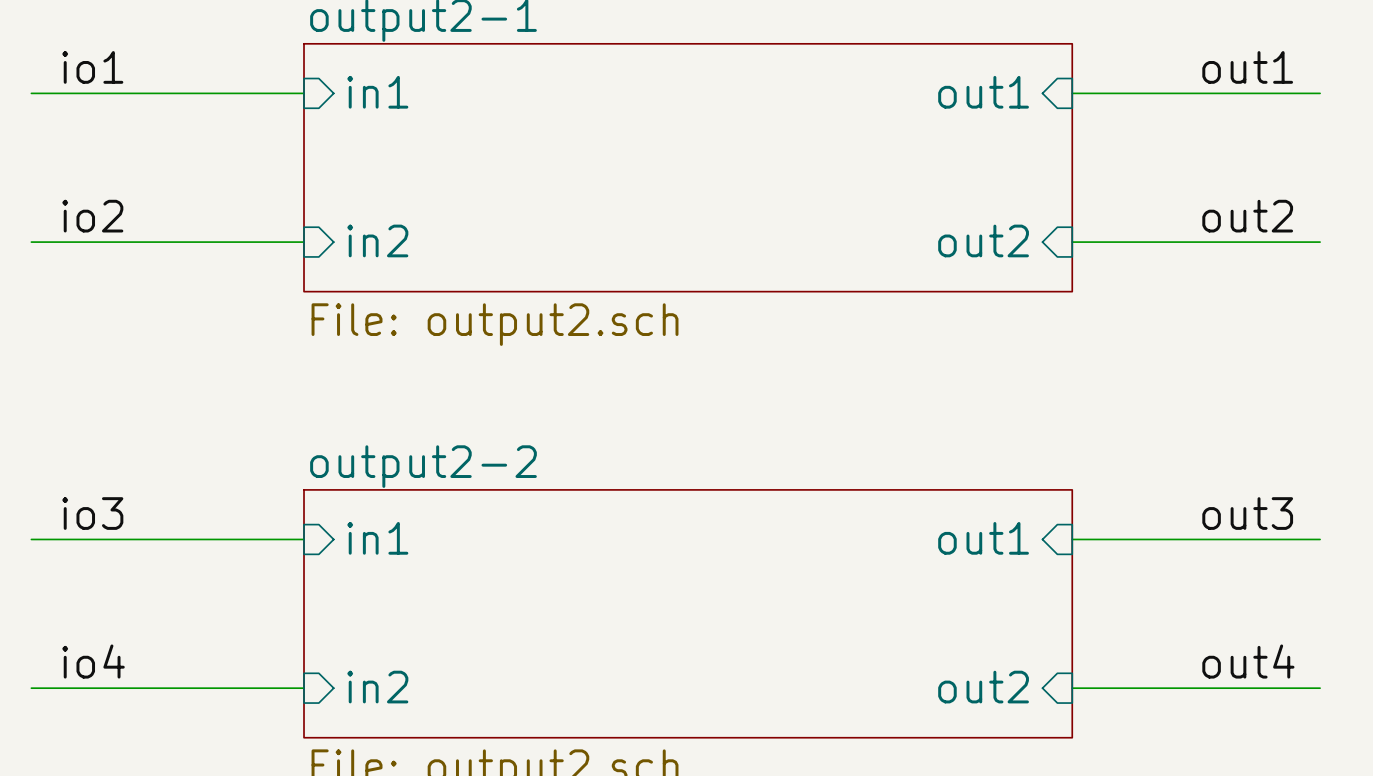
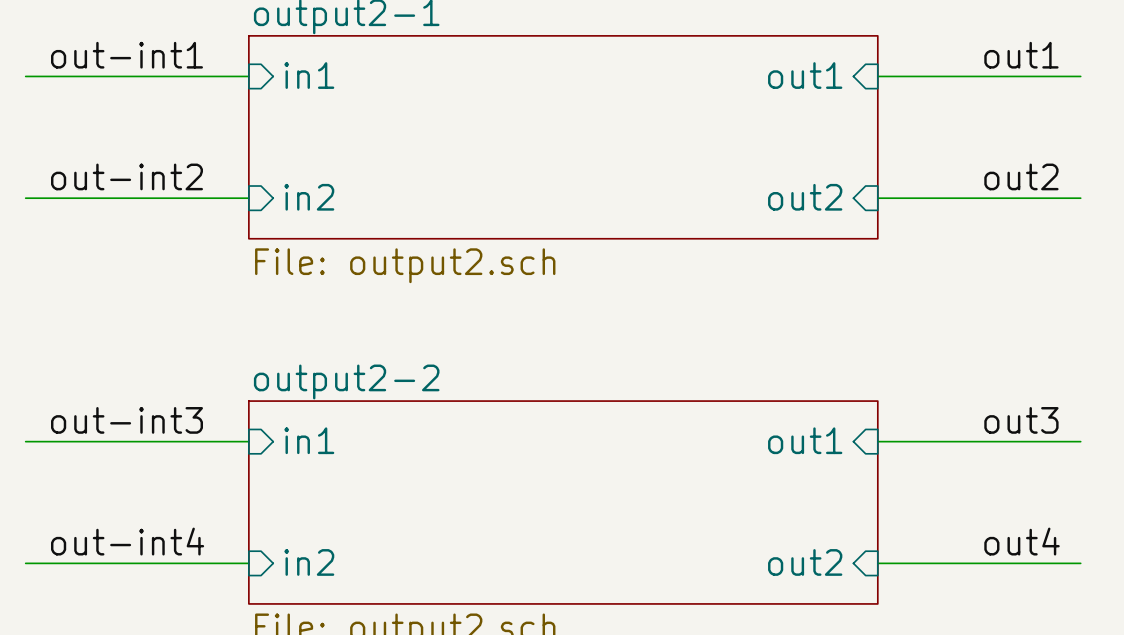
label: io1 (92, 67) -> out-int1 (127, 55)
label: io2 (92, 216) -> out-int2 (127, 176)
label: io3 (92, 513) -> out-int3 (127, 420)
label: io4 (93, 661) -> out-int4 (127, 541)

